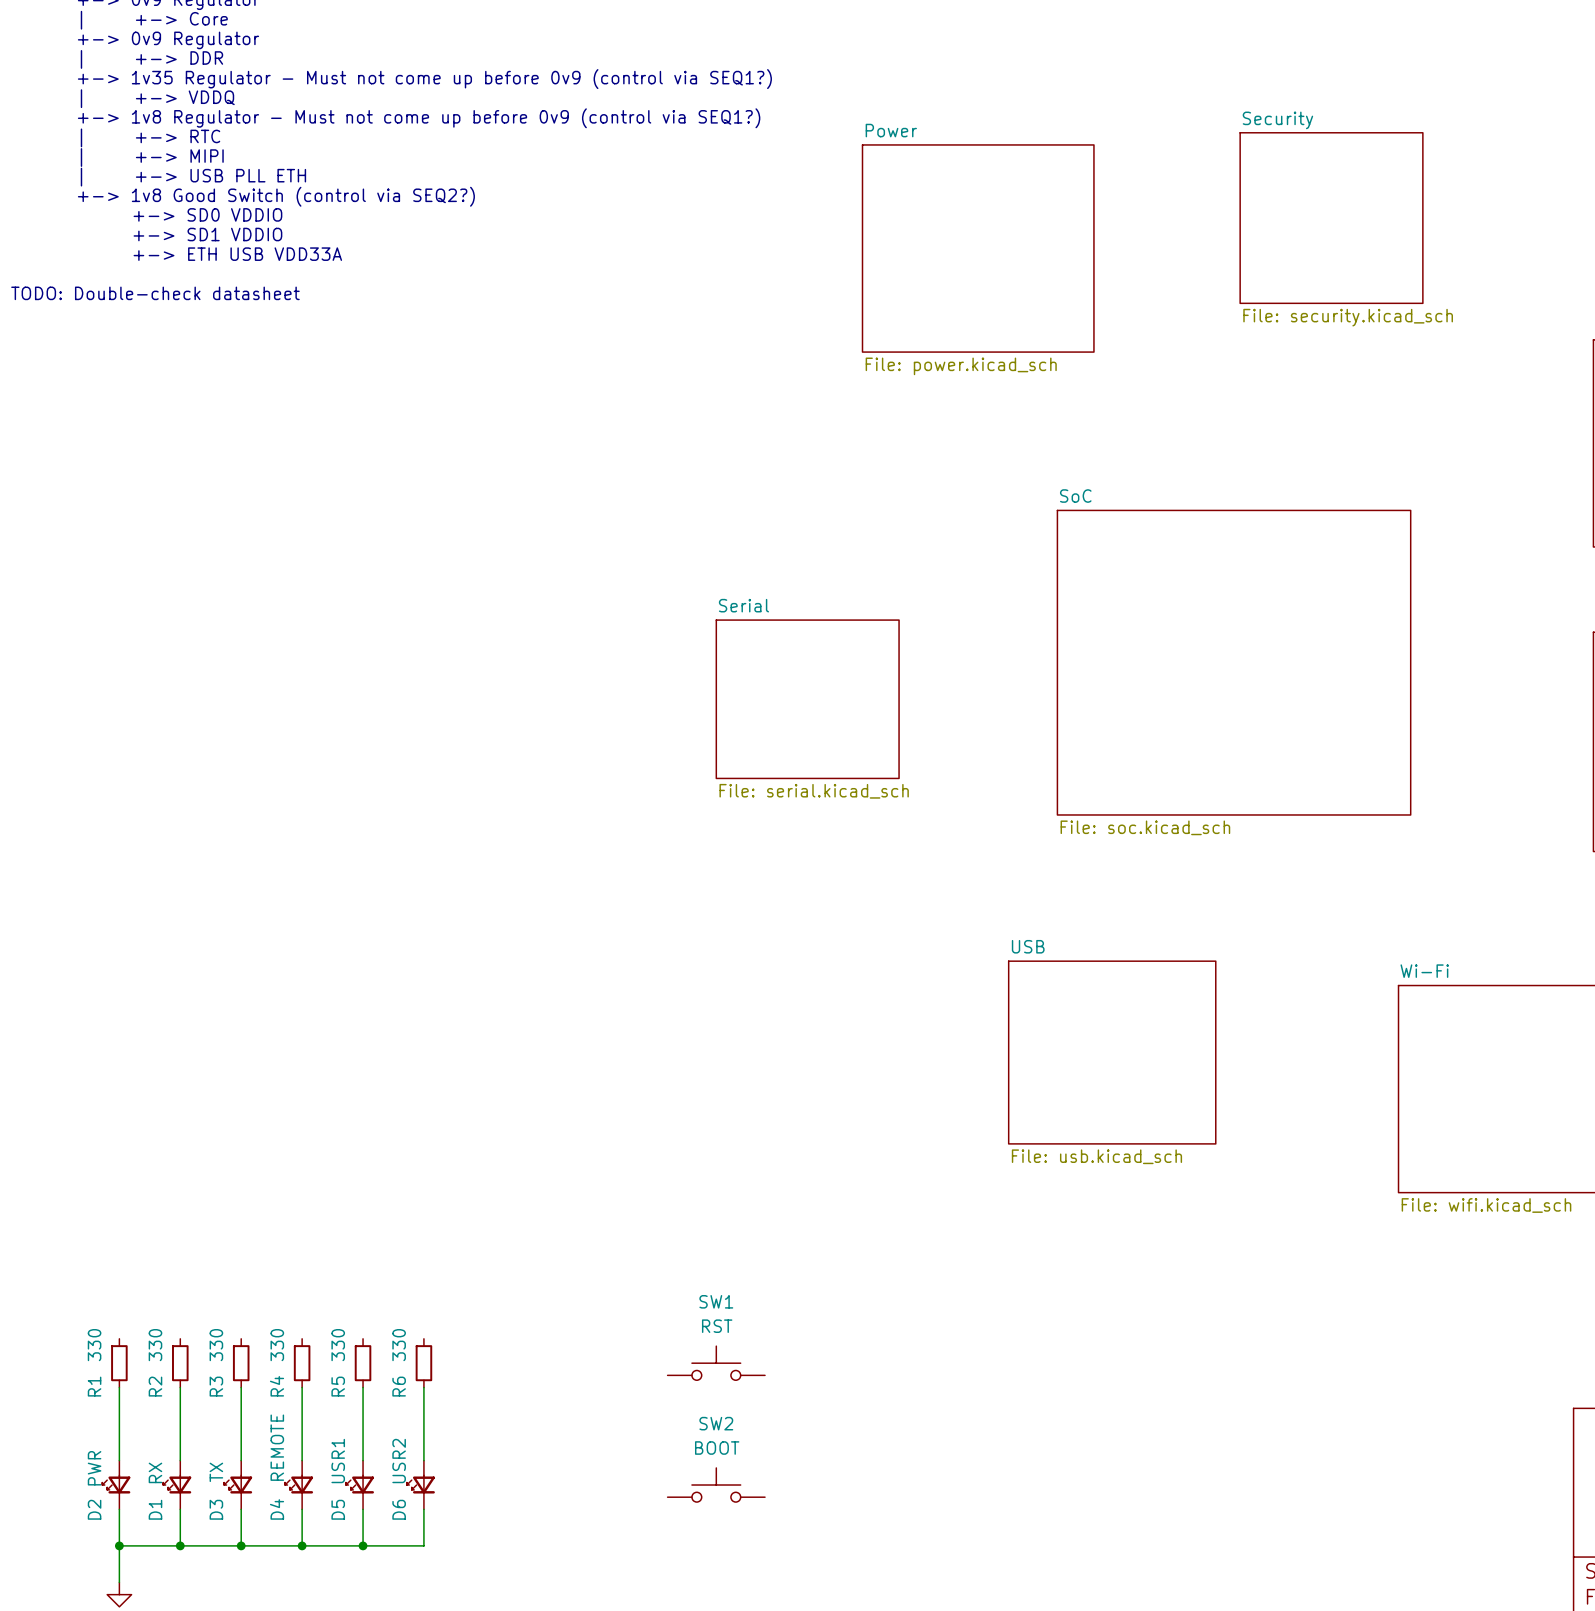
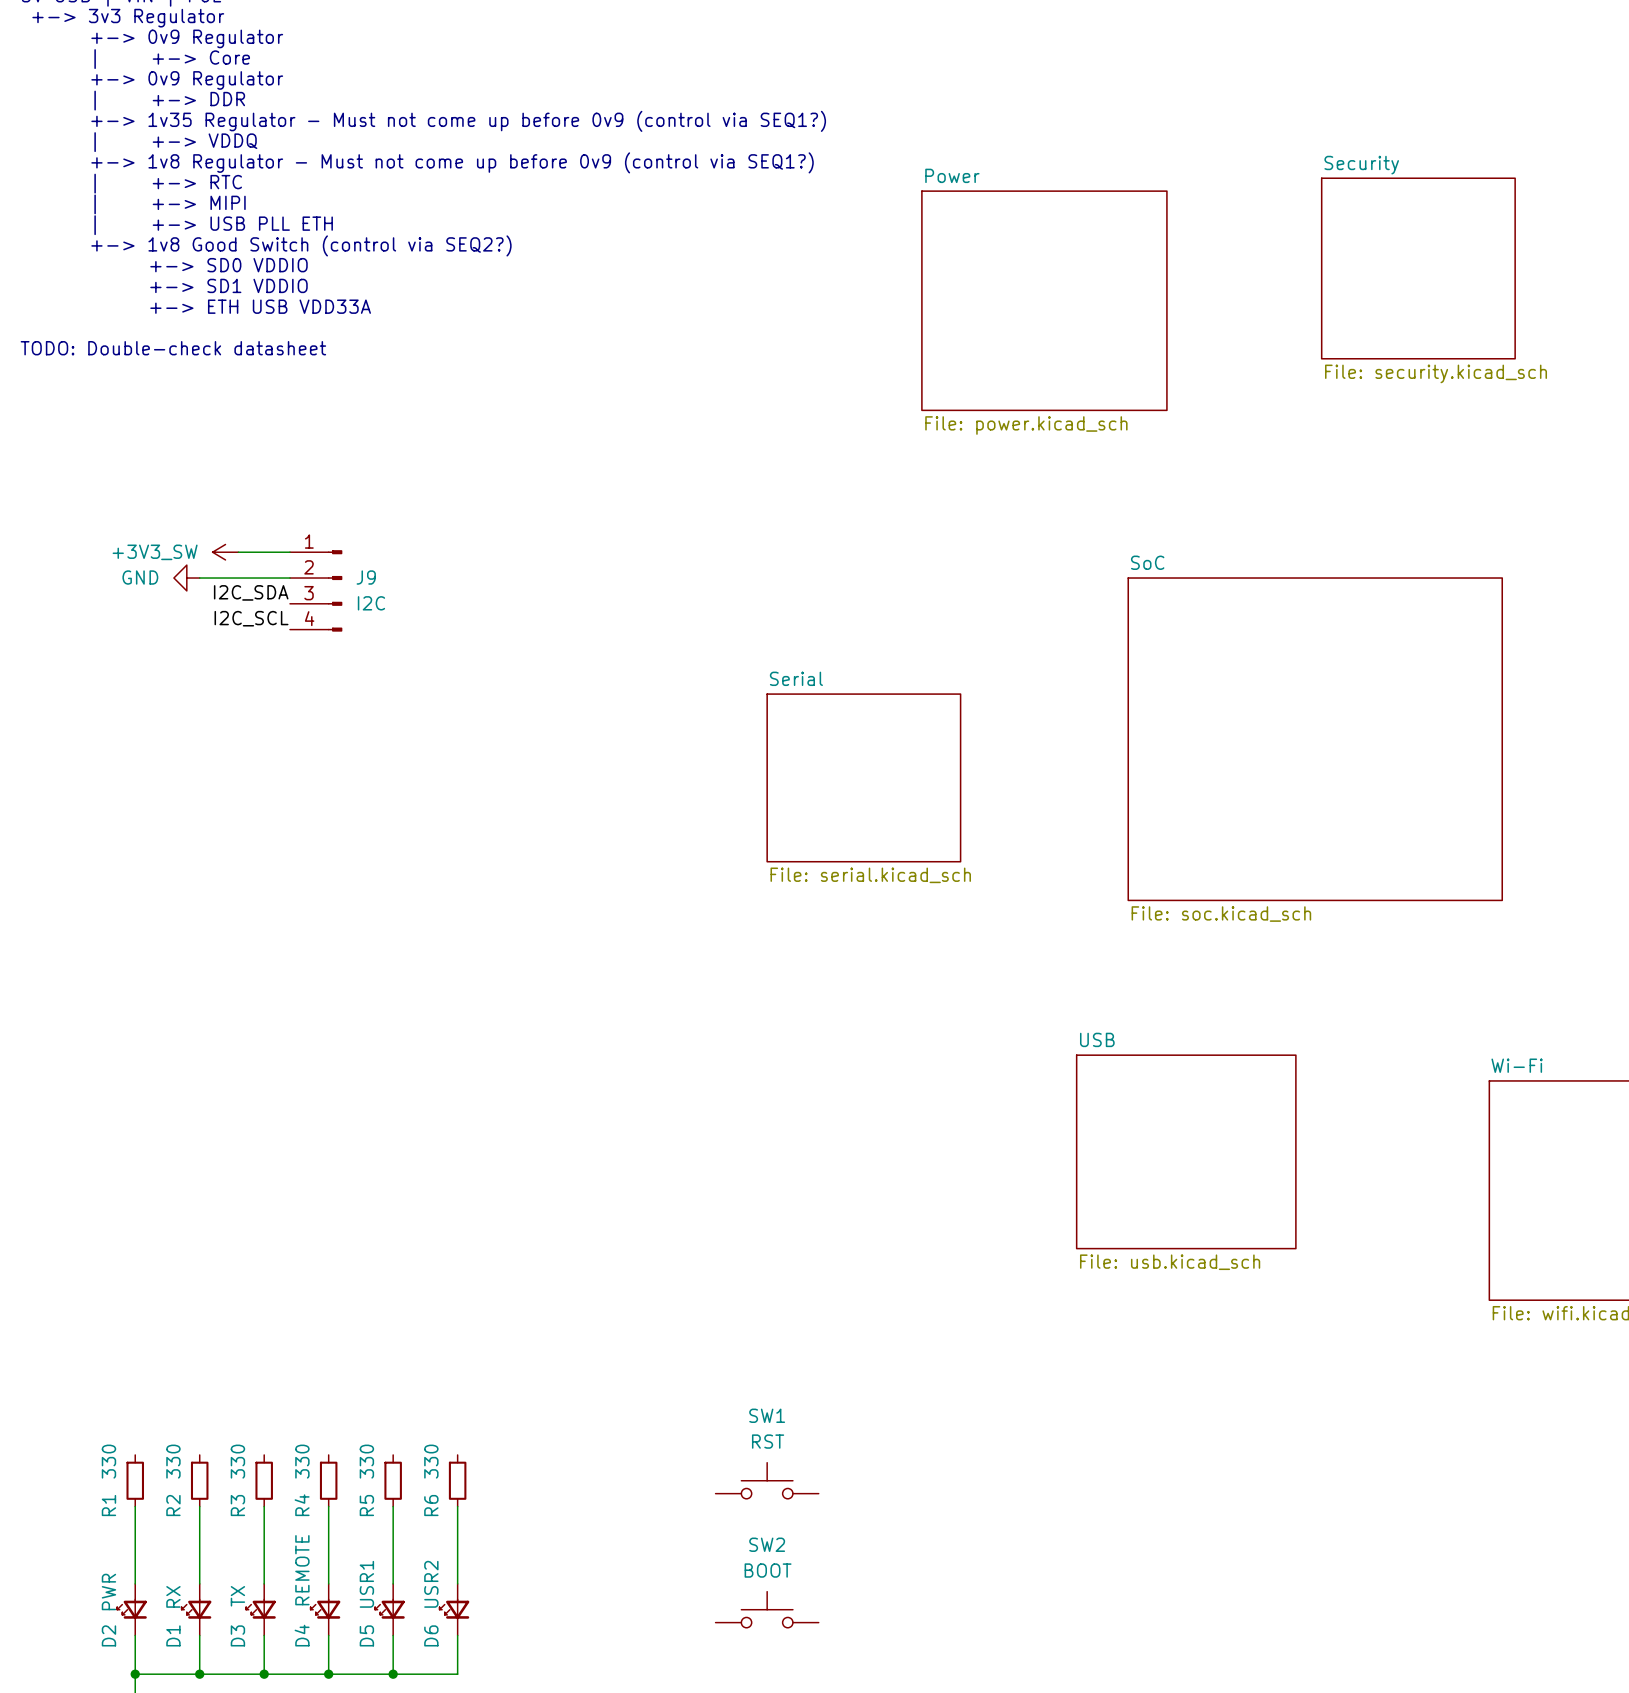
power symbol: none -> +3V3_SW (225, 552)
wire: none -> (238, 552) (289, 552)
power symbol: none -> GND (186, 578)
wire: none -> (199, 578) (289, 578)
J9: none -> I2C (316, 590)
label: none -> I2C_SDA (251, 592)
label: none -> I2C_SCL (251, 618)

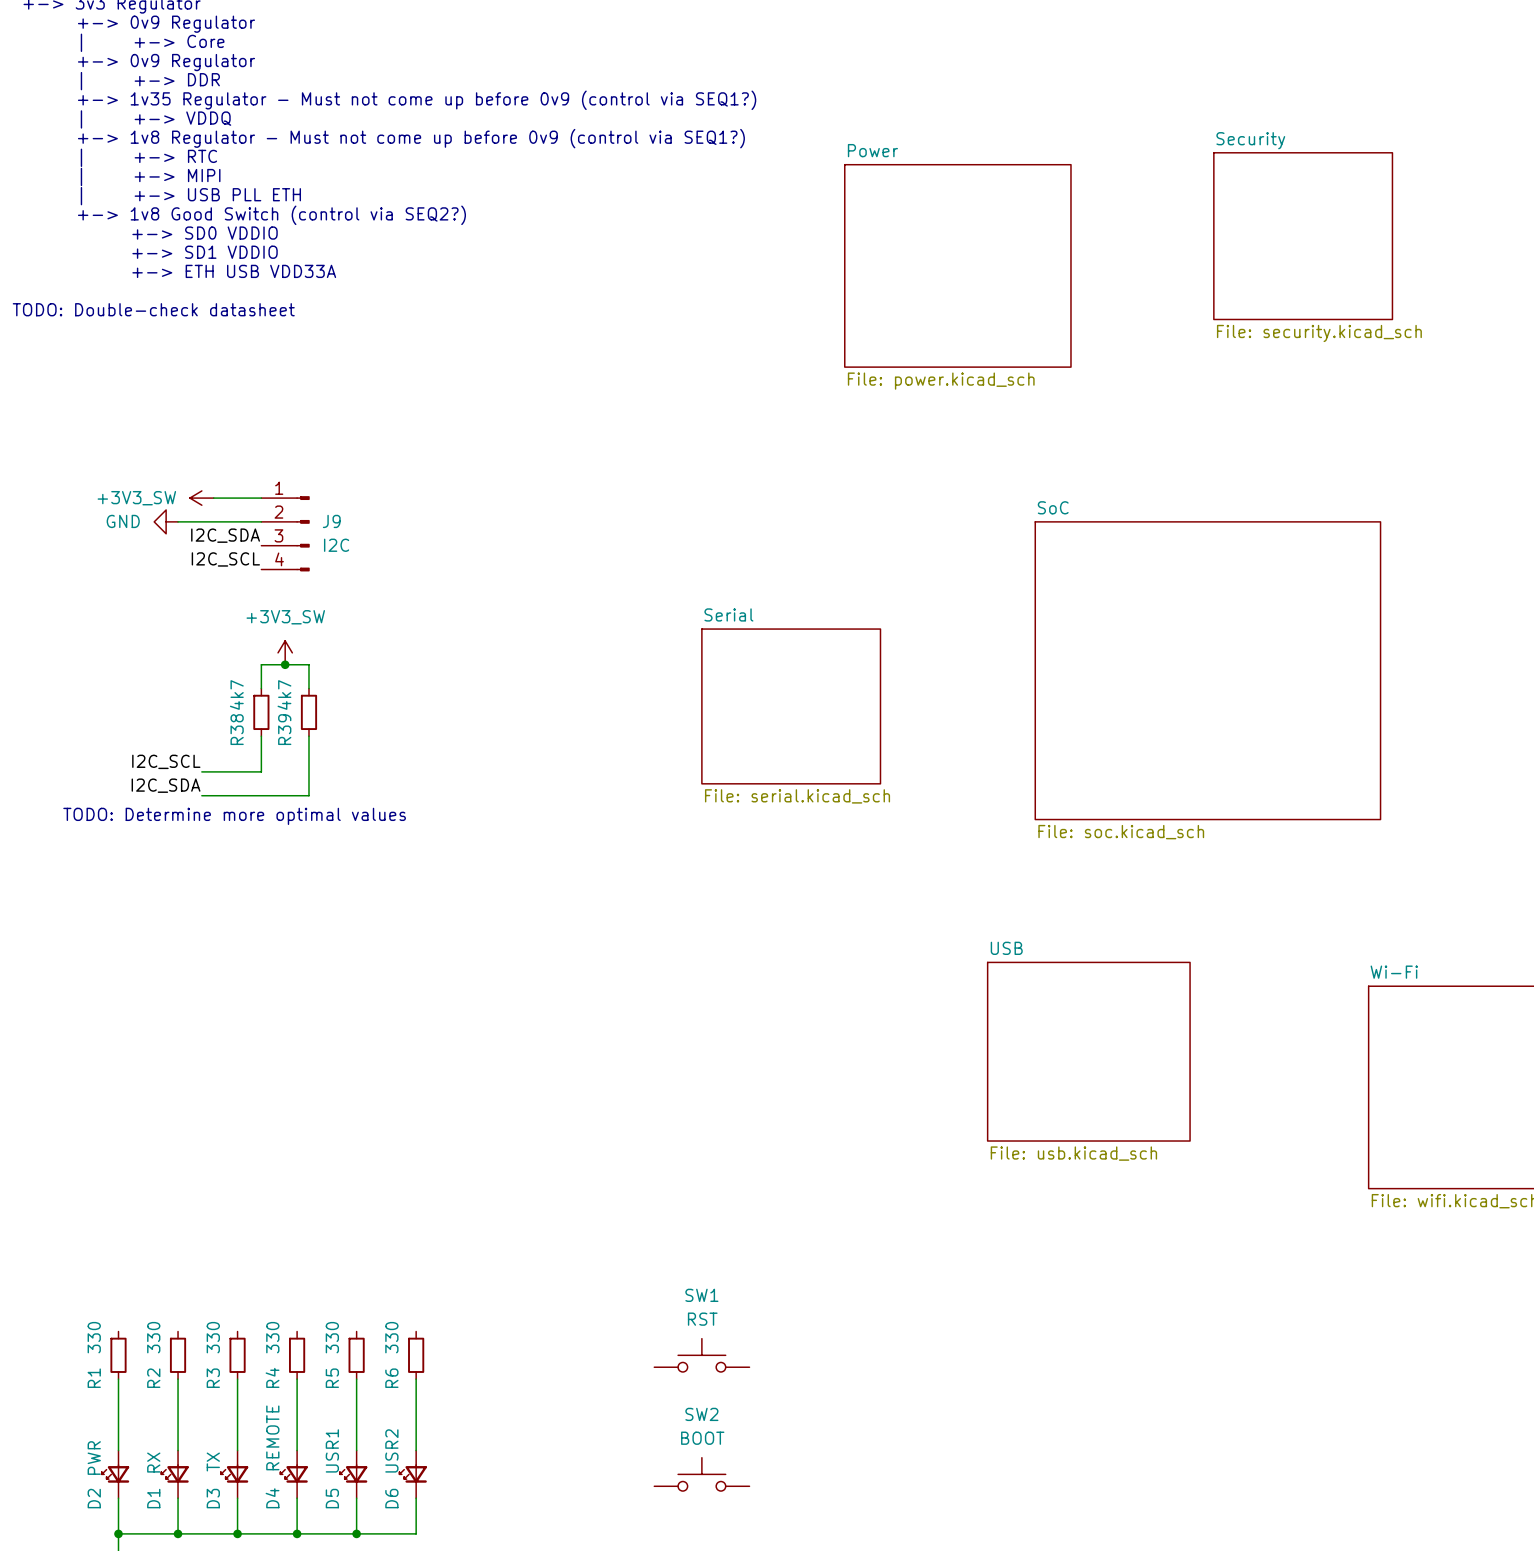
power symbol: none -> +3V3_SW (285, 652)
junction: none -> (285, 664)
wire: none -> (261, 688) (261, 664) (308, 664) (308, 688)
R38: none -> 4k7 (261, 712)
R39: none -> 4k7 (308, 712)
wire: none -> (261, 736) (261, 771) (201, 771)
wire: none -> (308, 736) (308, 795) (201, 795)
label: none -> I2C_SCL (166, 761)
label: none -> I2C_SDA (166, 785)
text: none -> TODO: Determine more optimal values (234, 816)

